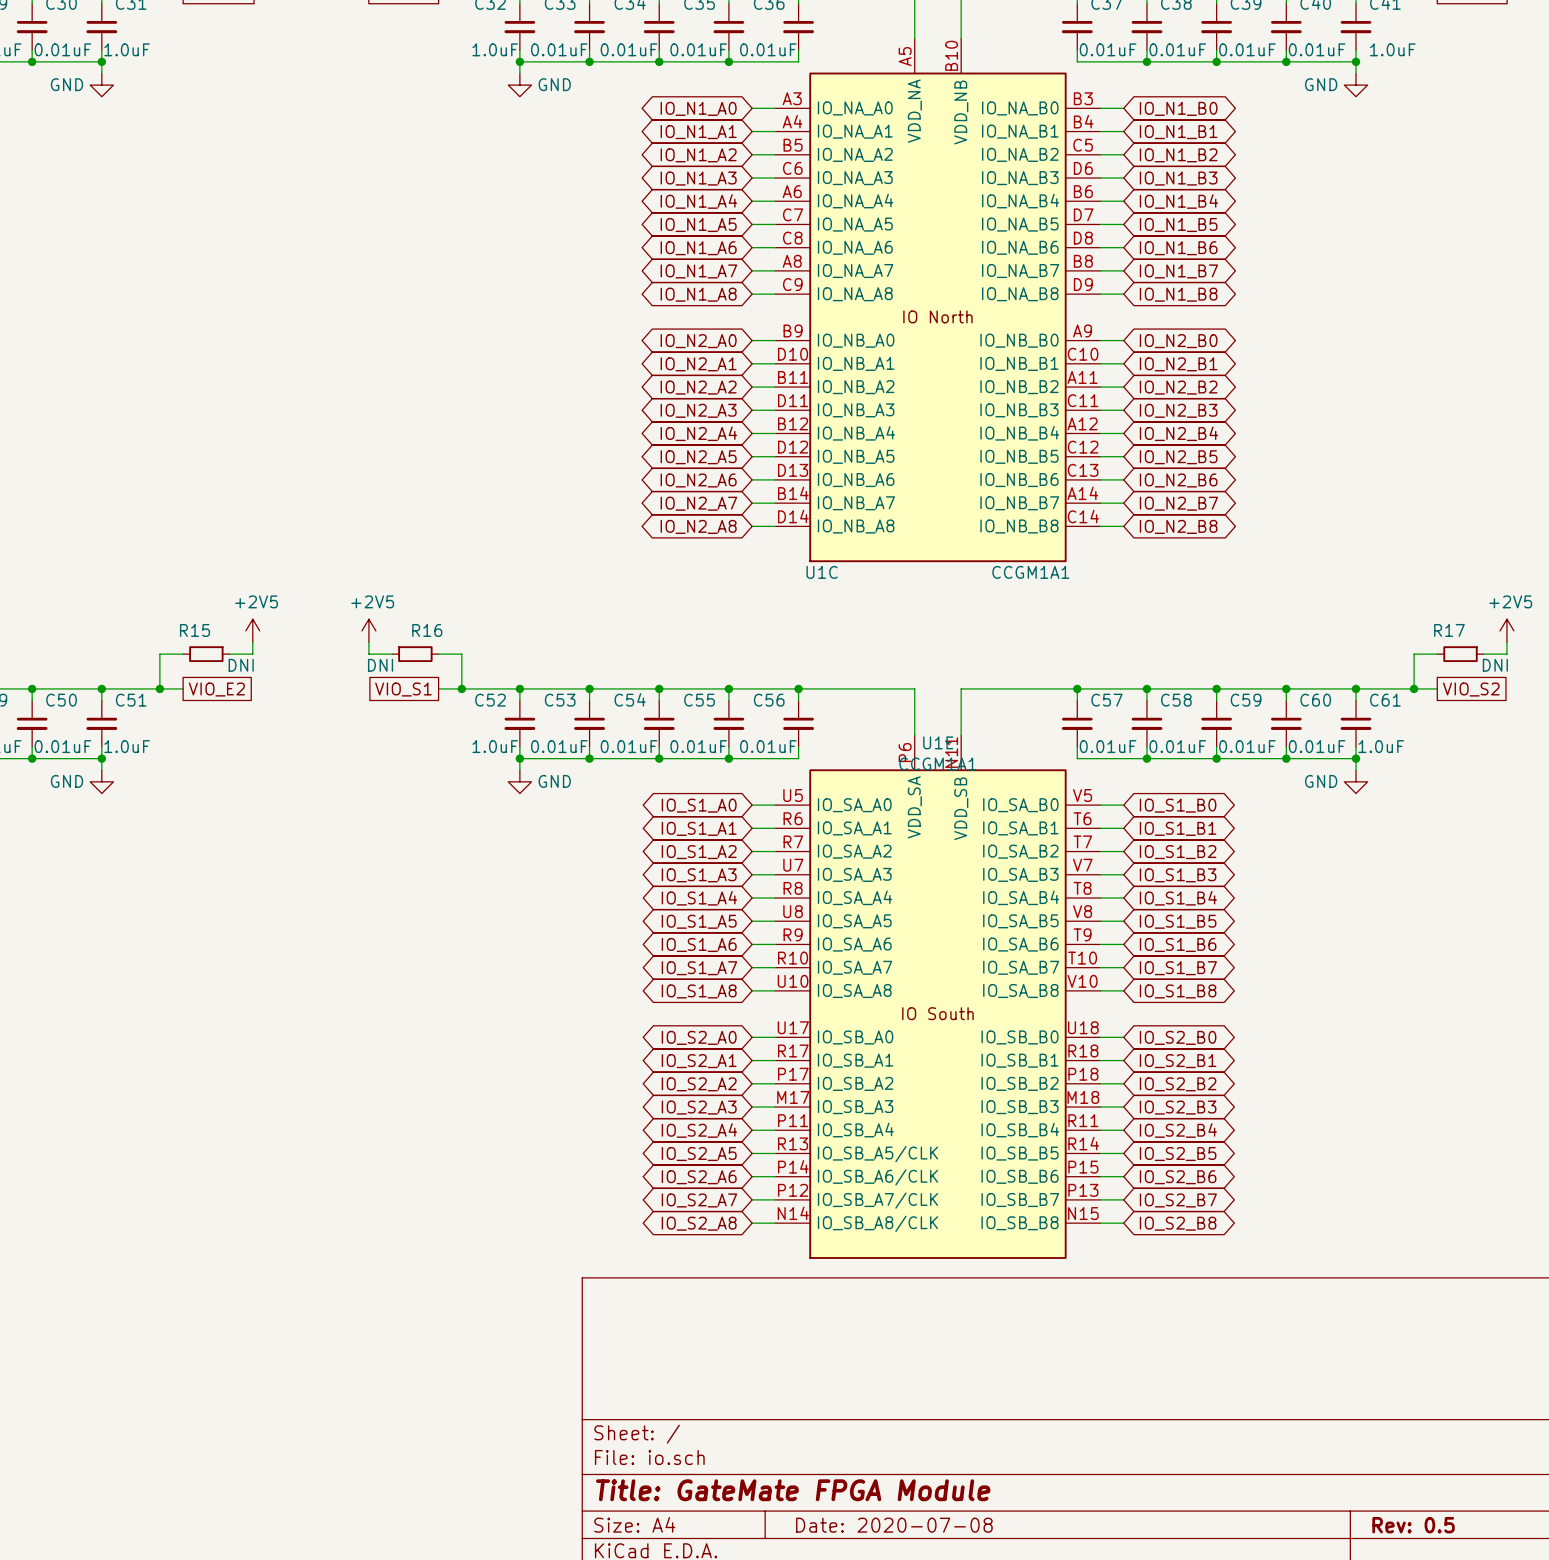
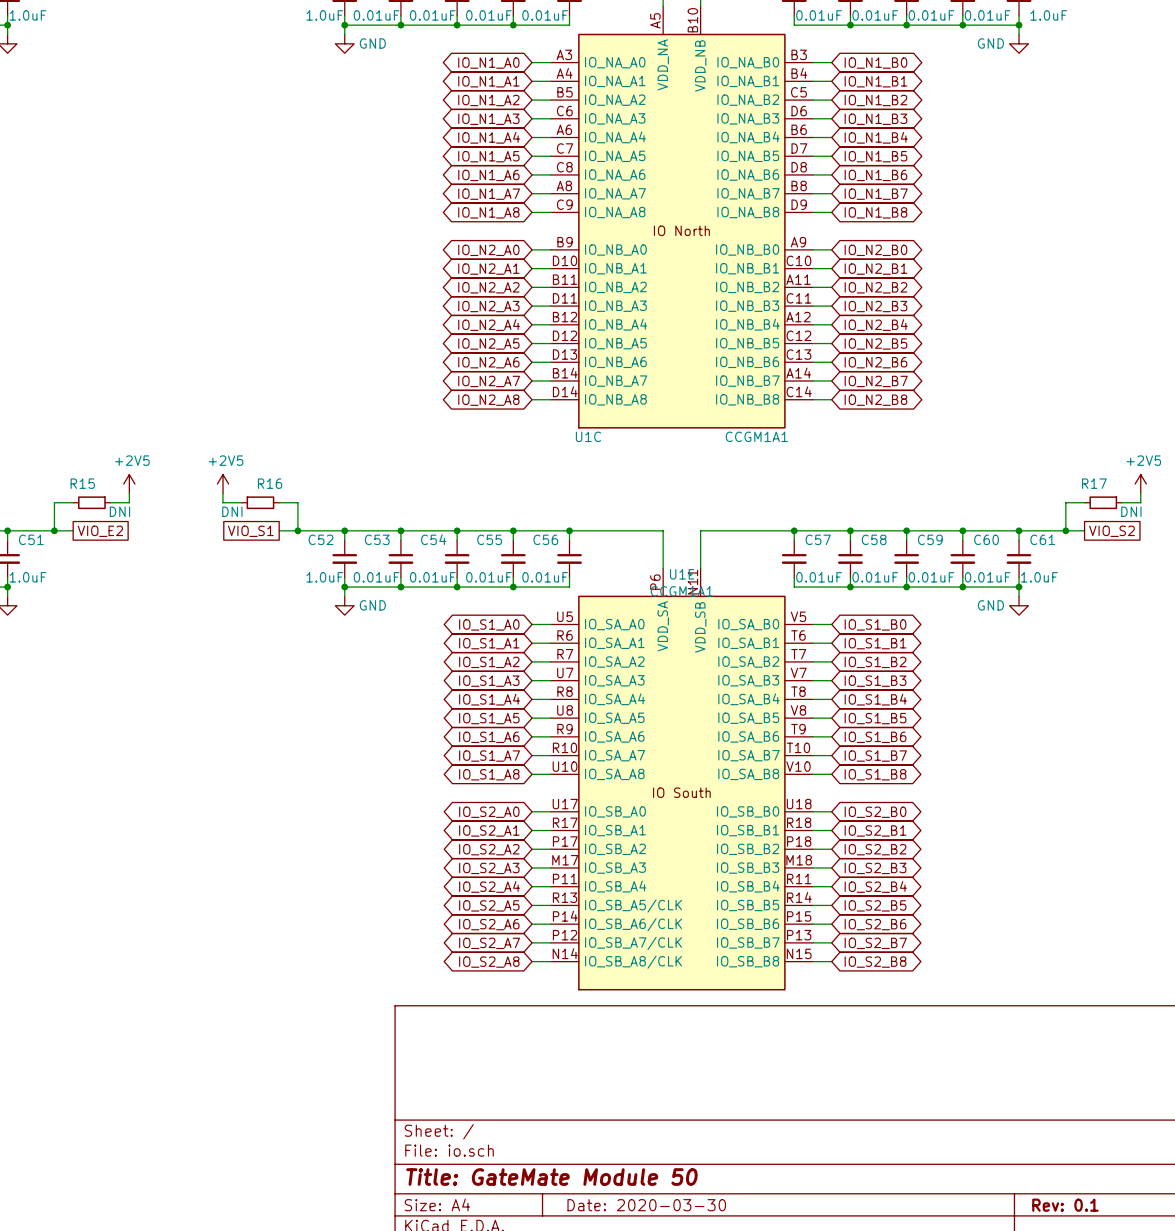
title block: Title: GateMate FPGA Module (793, 1490) -> Title: GateMate Module 50 (551, 1177)
title block: Date: 2020-07-08 (894, 1525) -> Date: 2020-03-30 (646, 1205)
title block: Rev: 0.5 (1413, 1525) -> Rev: 0.1 (1065, 1205)

